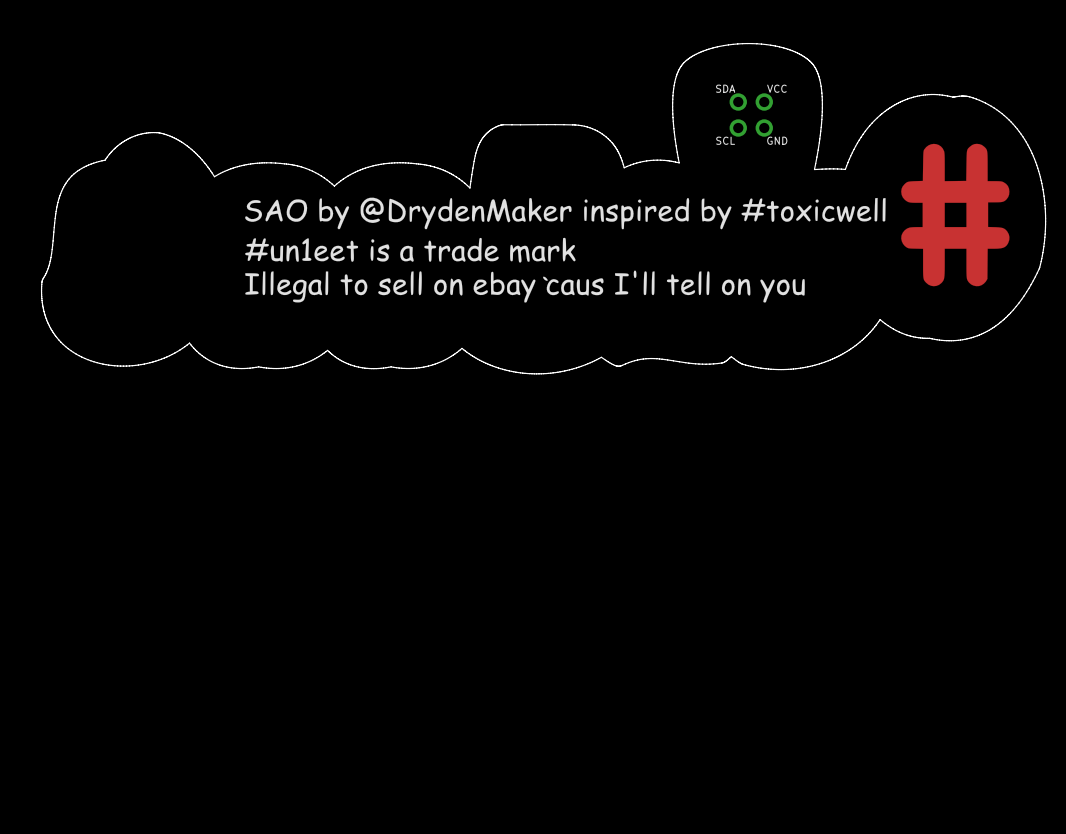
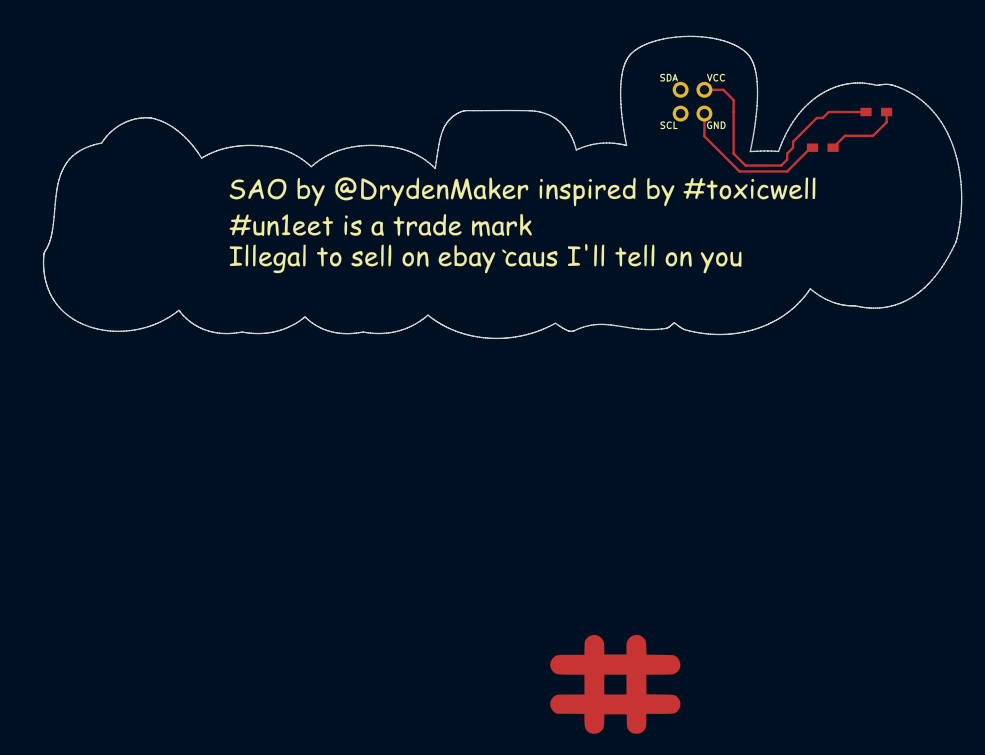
top track: none -> (704, 89) (723, 89) (733, 100) (733, 153) (745, 165) (781, 165) (787, 159) (787, 153) (793, 147) (793, 141) (816, 117) (822, 117) (828, 112) (866, 112)
part: none -> (876, 112)
top track: none -> (886, 112) (886, 122) (873, 135) (844, 135) (833, 147)
top track: none -> (704, 113) (704, 136) (739, 171) (787, 171) (812, 147)
drawing: [901, 143, 1010, 287] -> none
part: none -> (822, 147)
drawing: none -> [550, 634, 681, 734]

